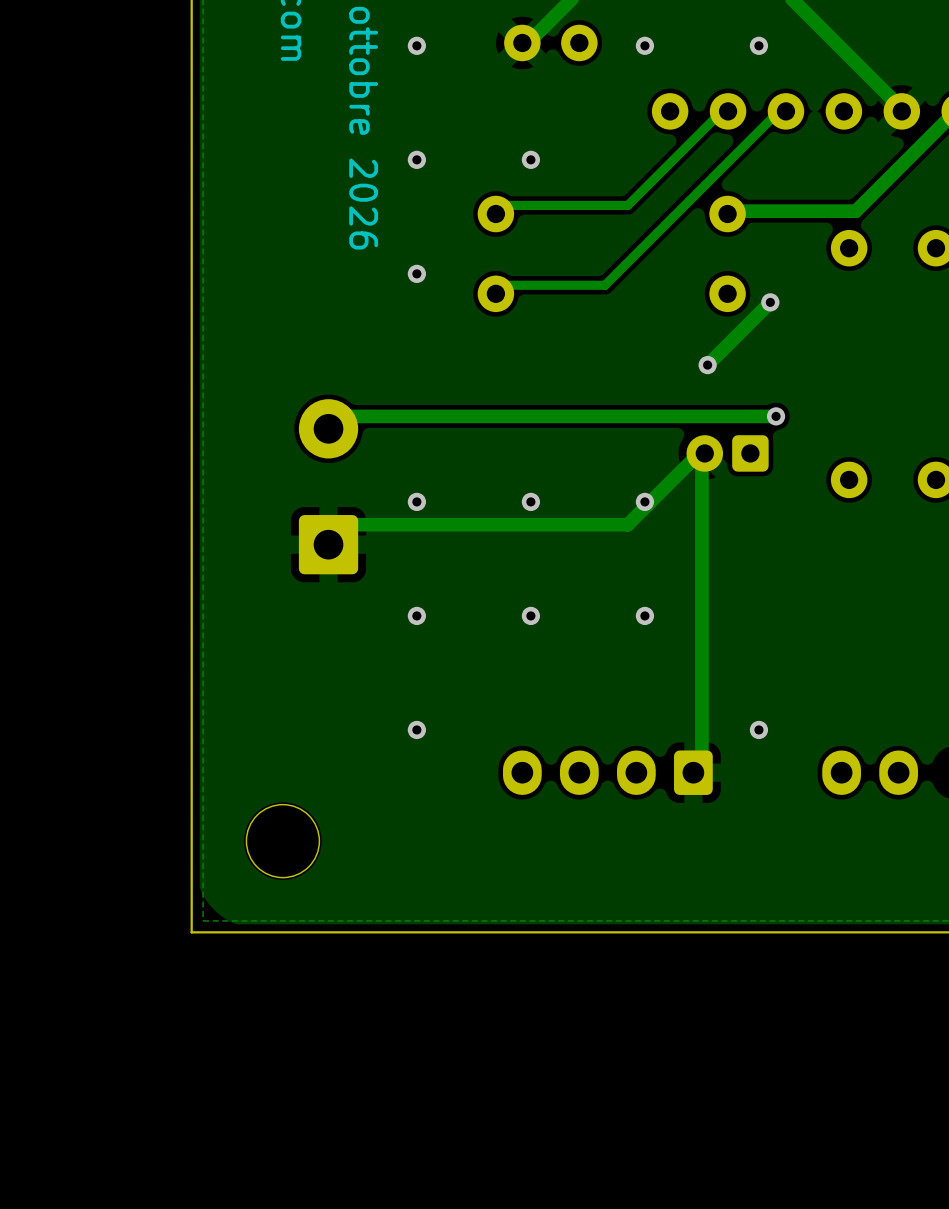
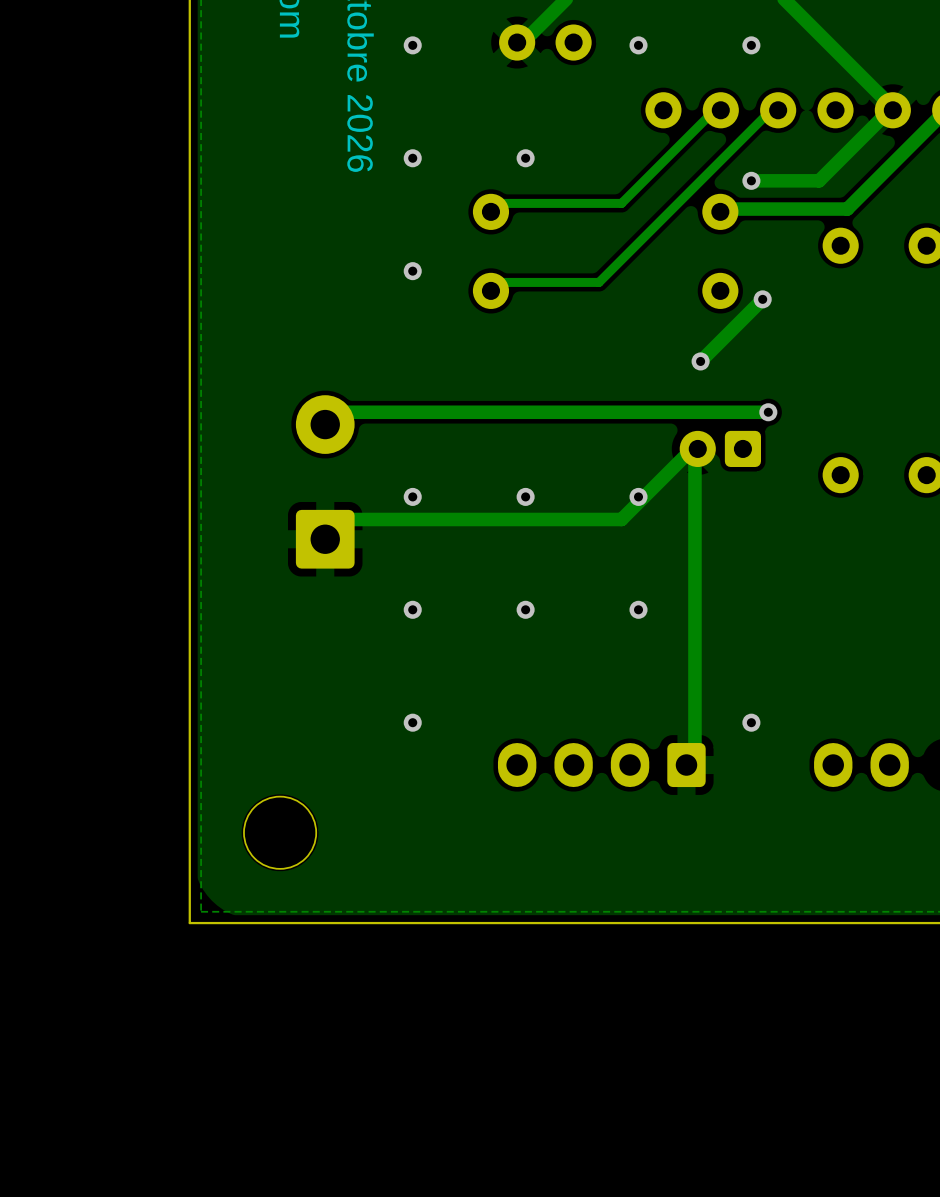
track: none -> (892, 110) (886, 113) (819, 180) (751, 180)
via: none -> (751, 180)

